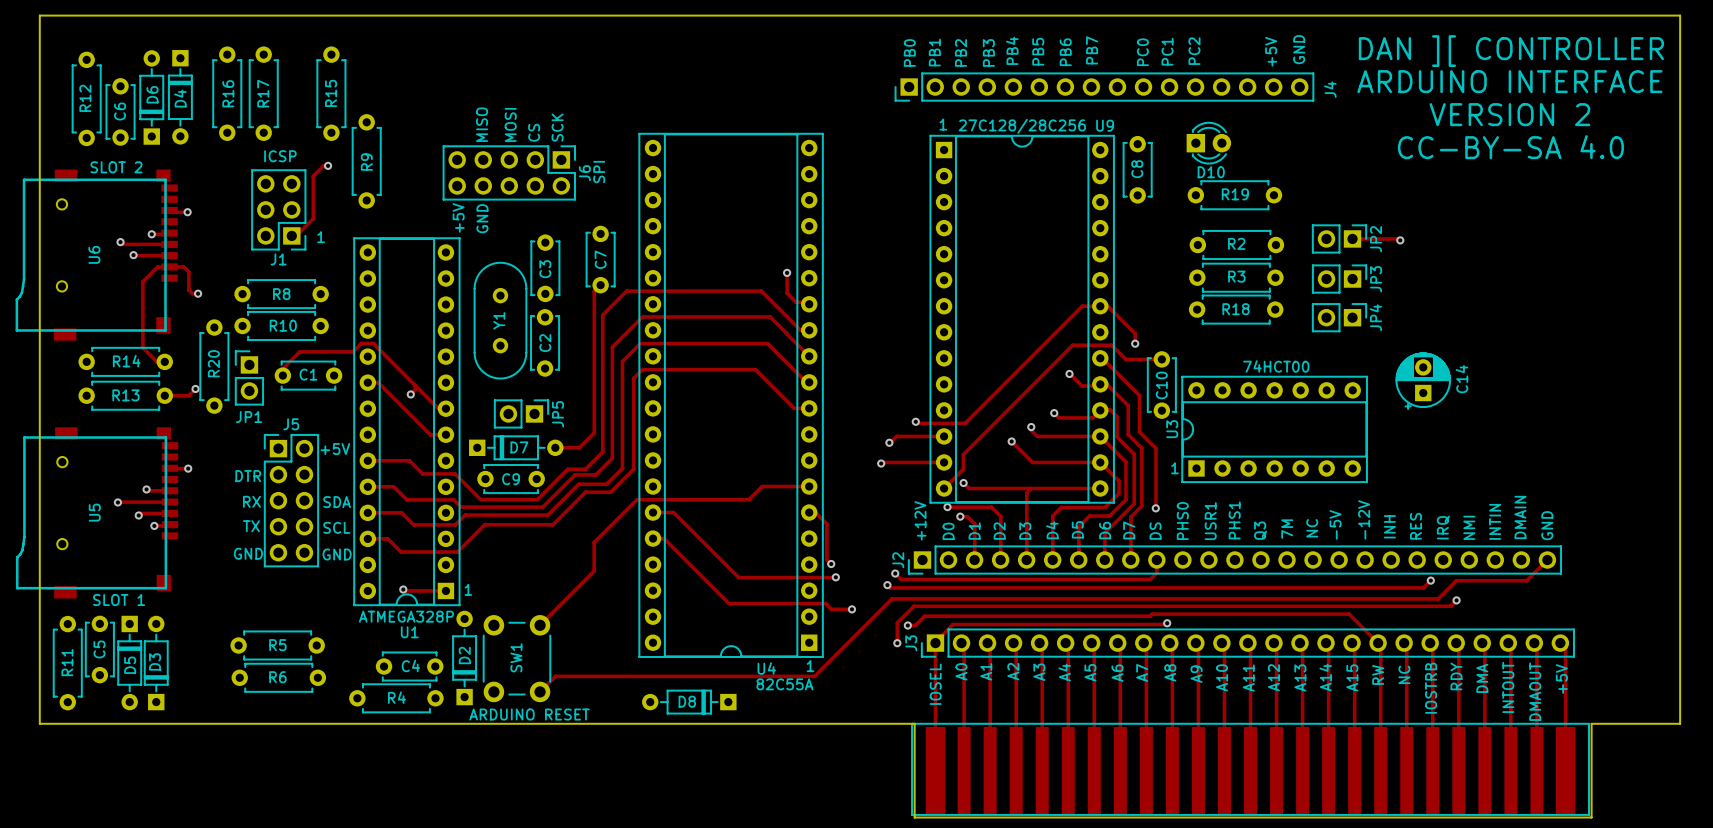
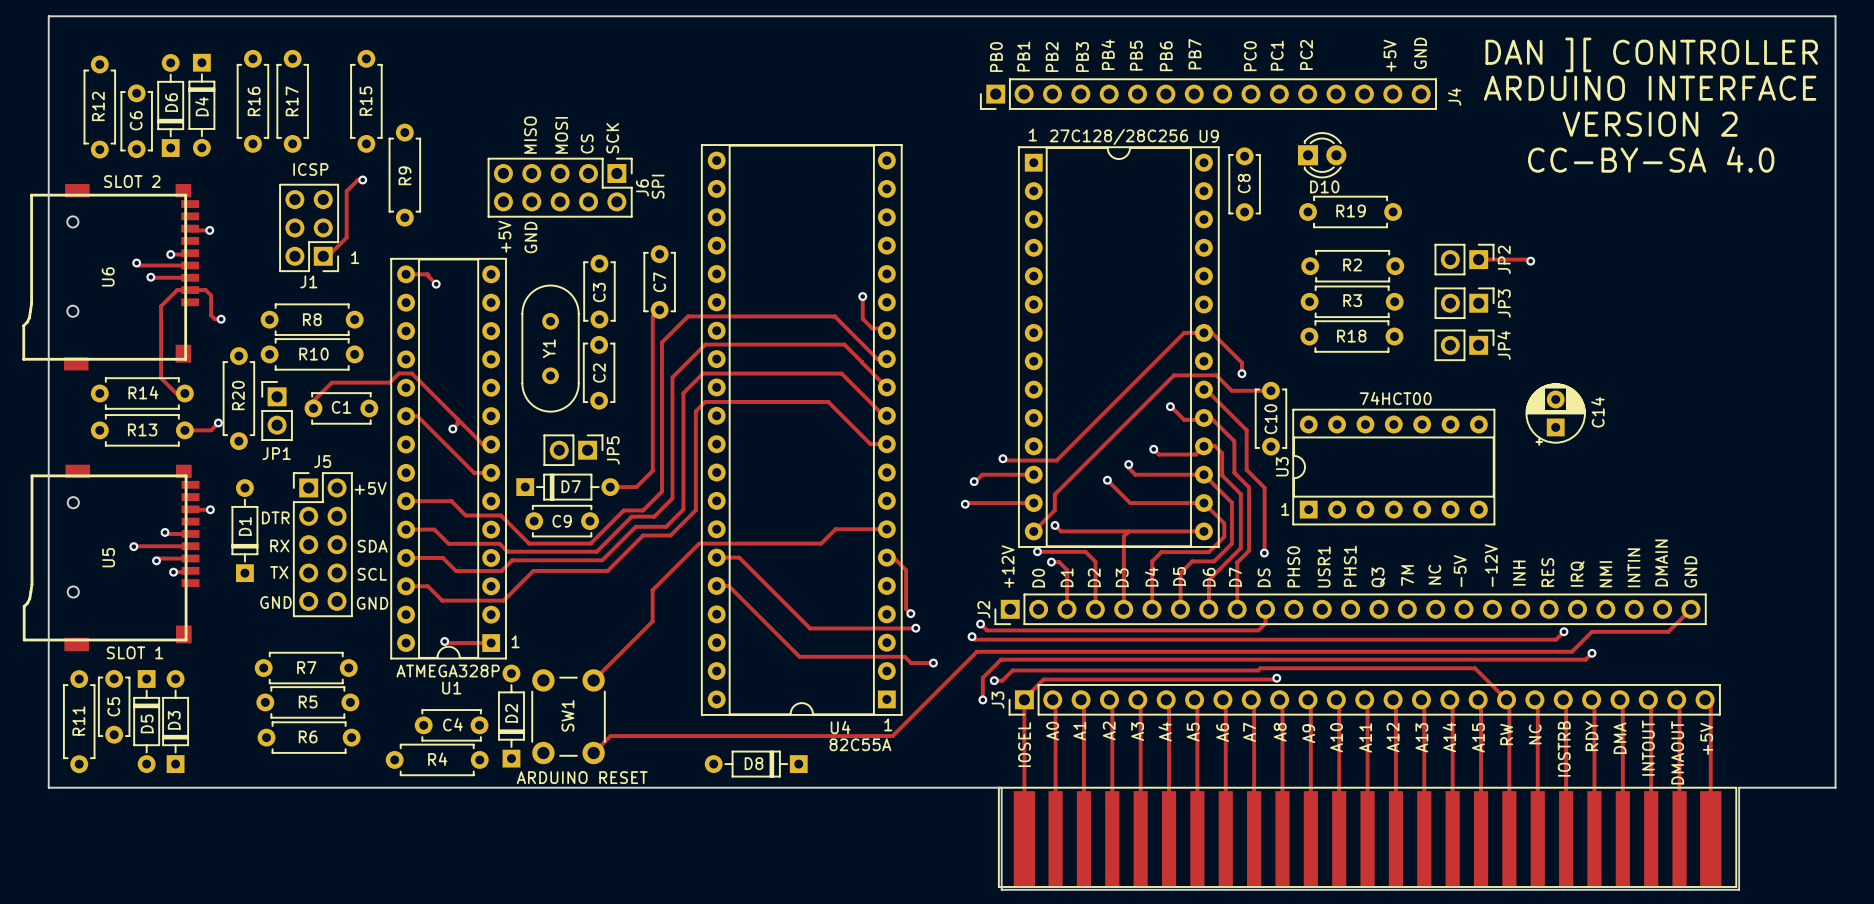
track: none -> (406, 274) (427, 274) (436, 284)
via: none -> (436, 284)
D1: none -> (244, 530)
R7: none -> (306, 668)

